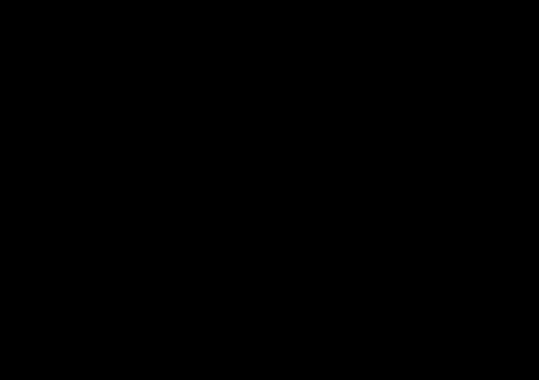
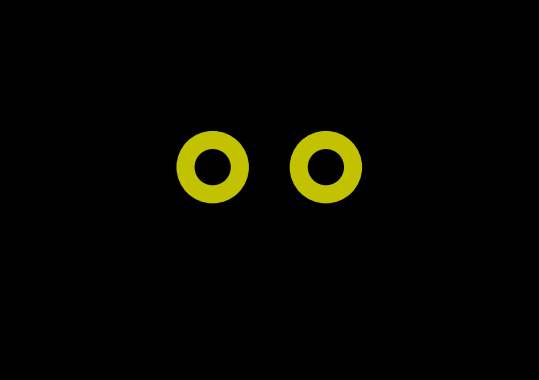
part: none -> (269, 167)

